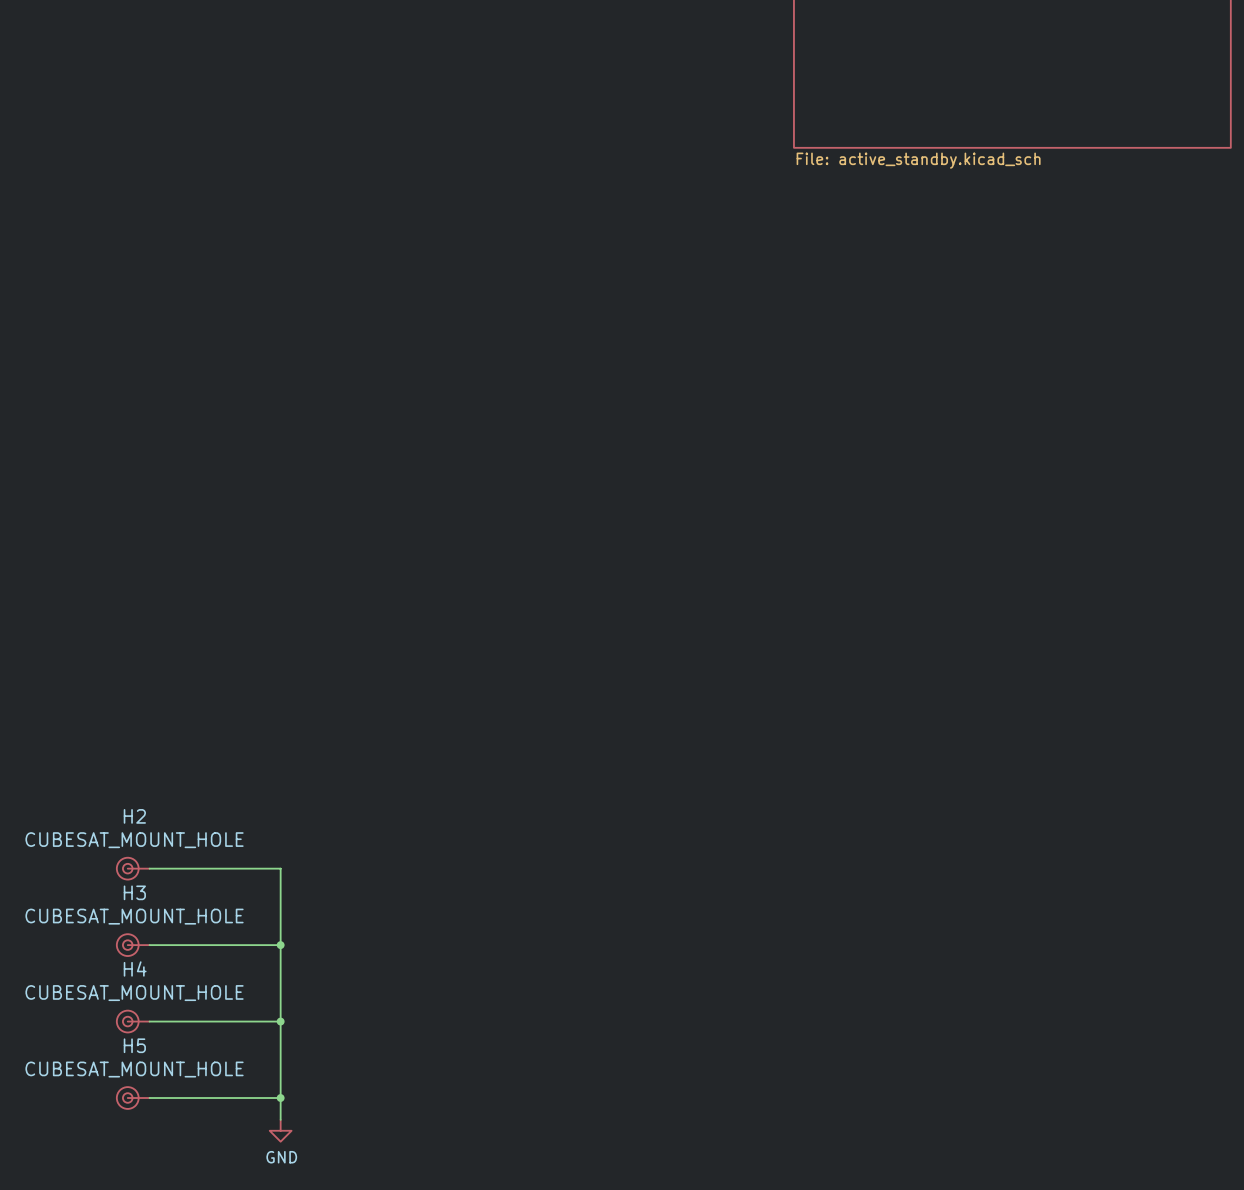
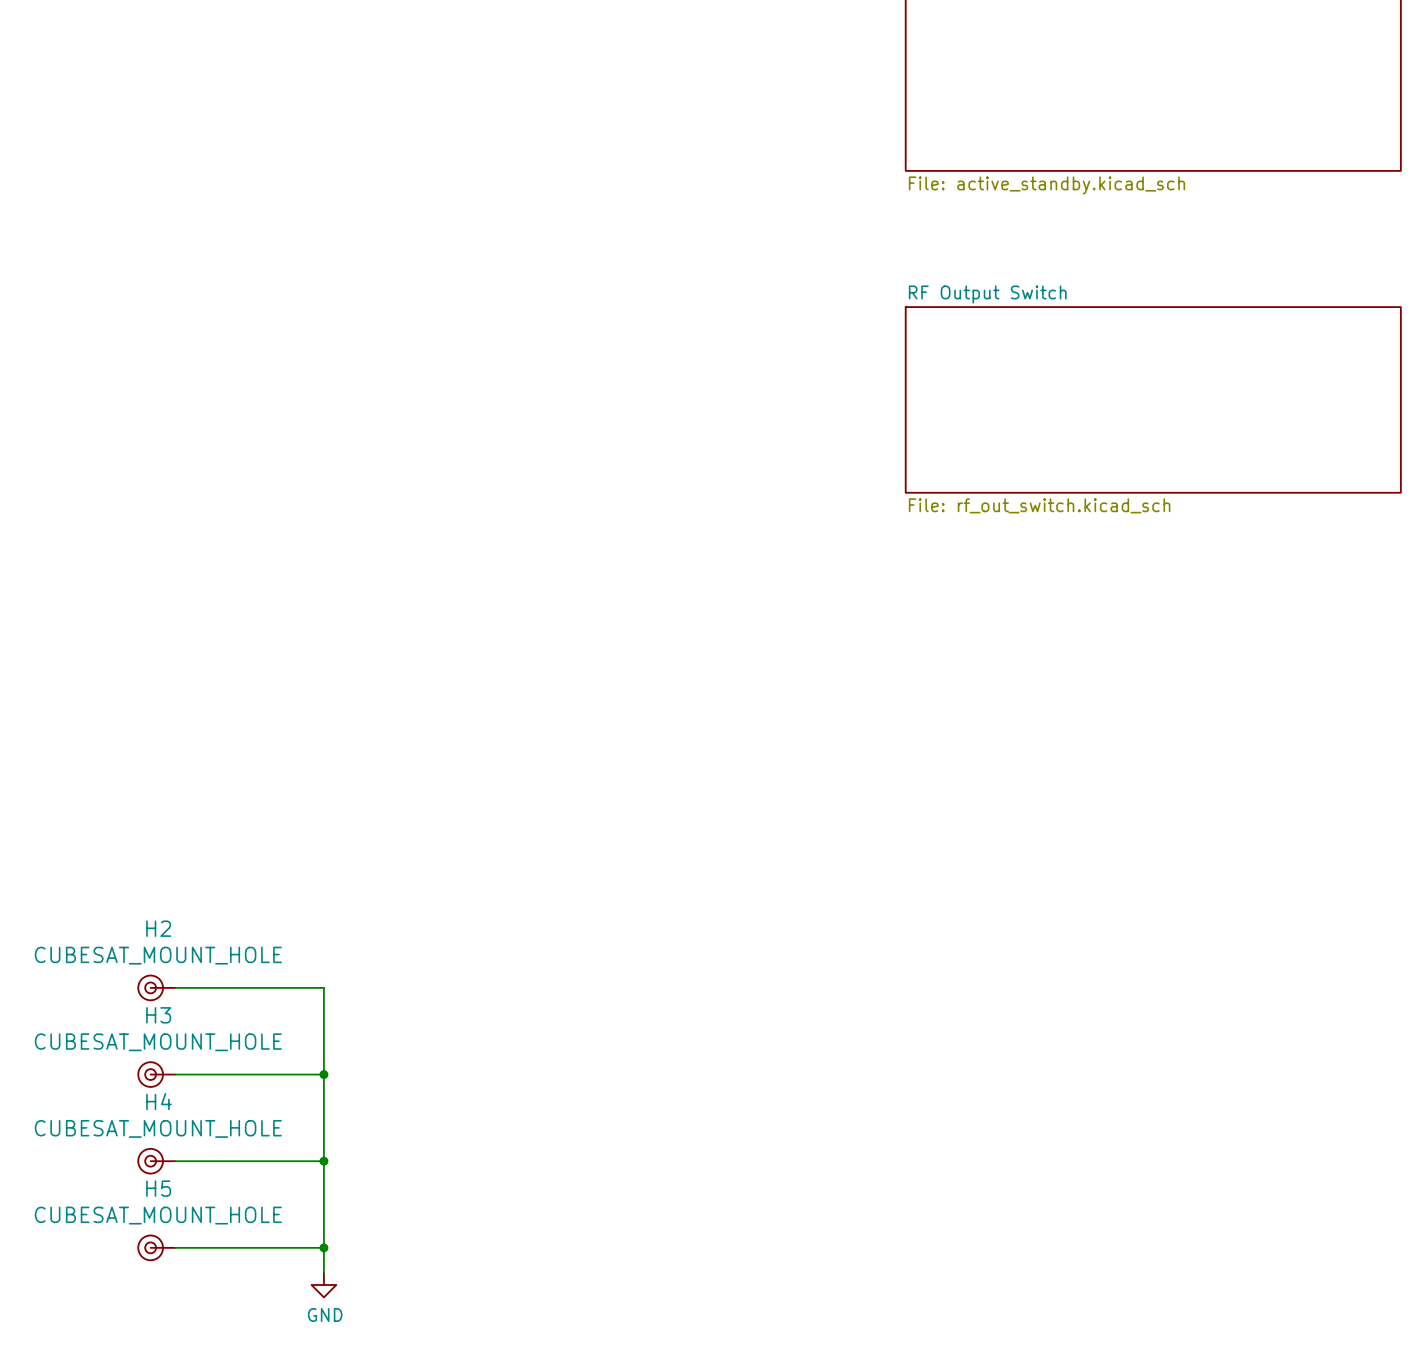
sheet RF Output Switch: none -> File: rf_out_switch.kicad_sch (1153, 399)

